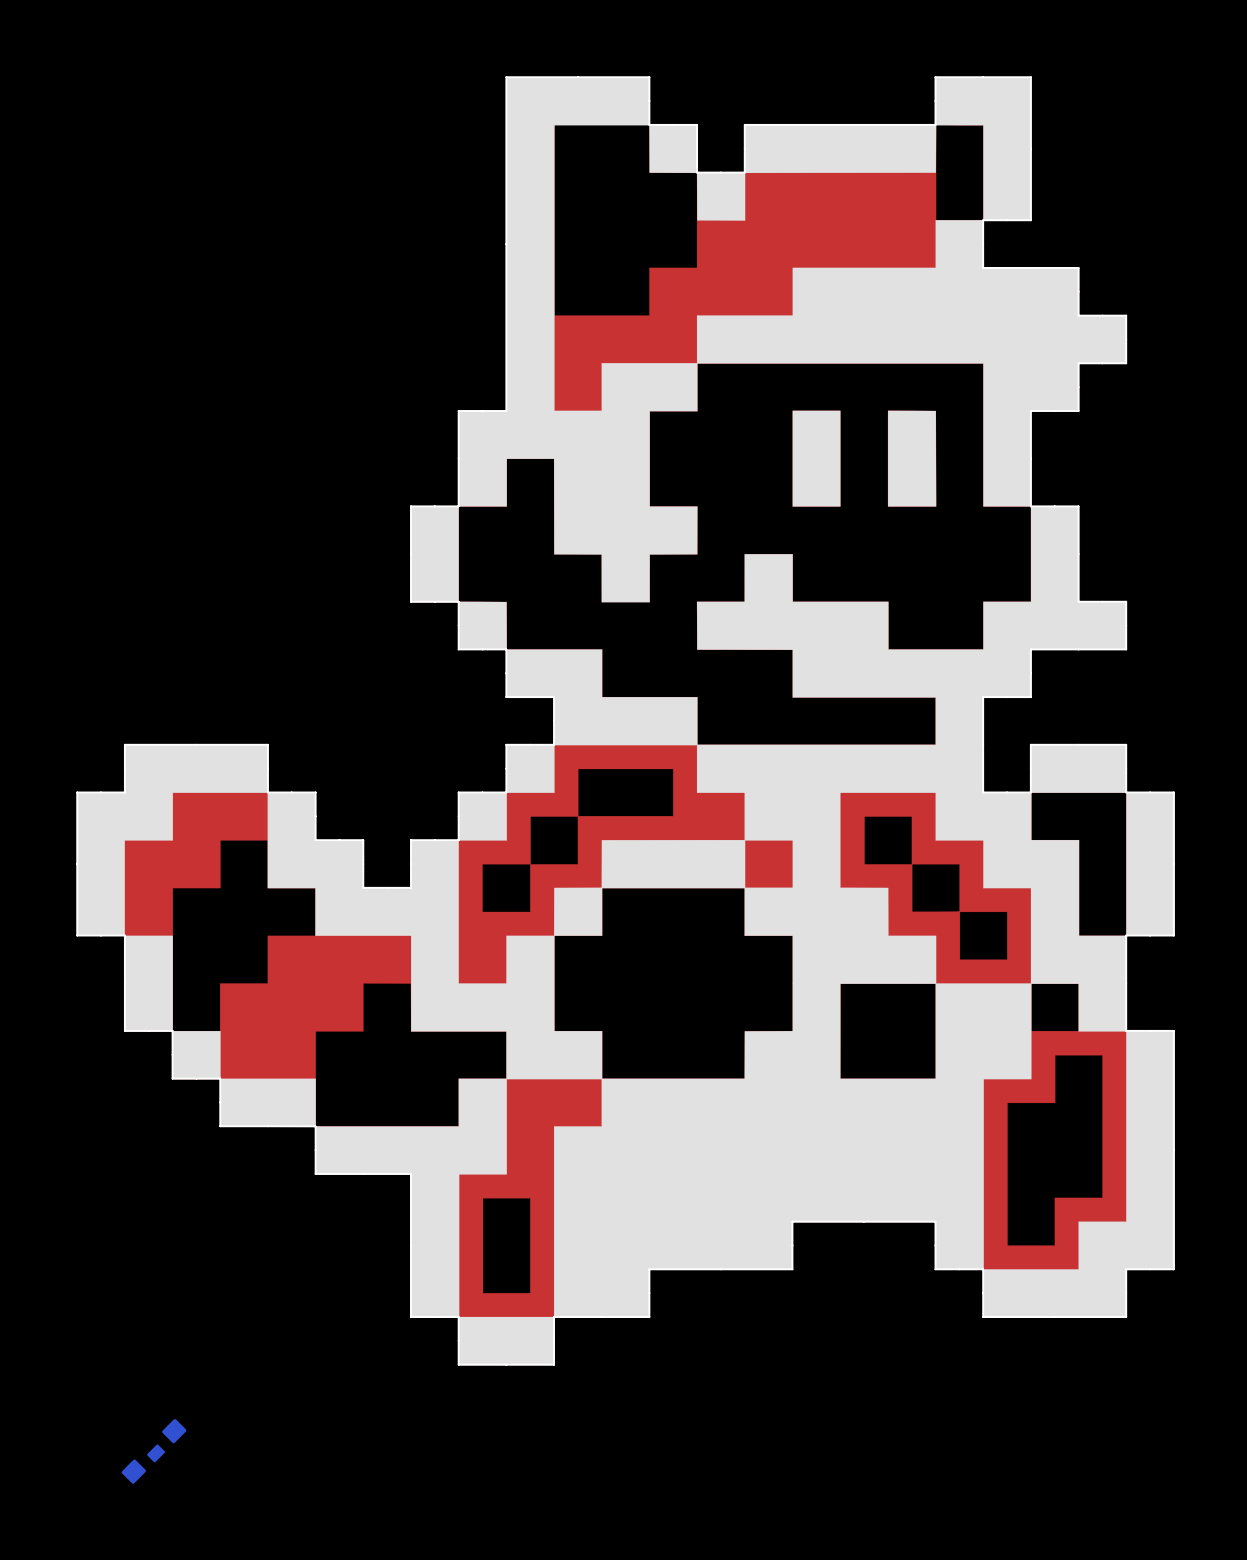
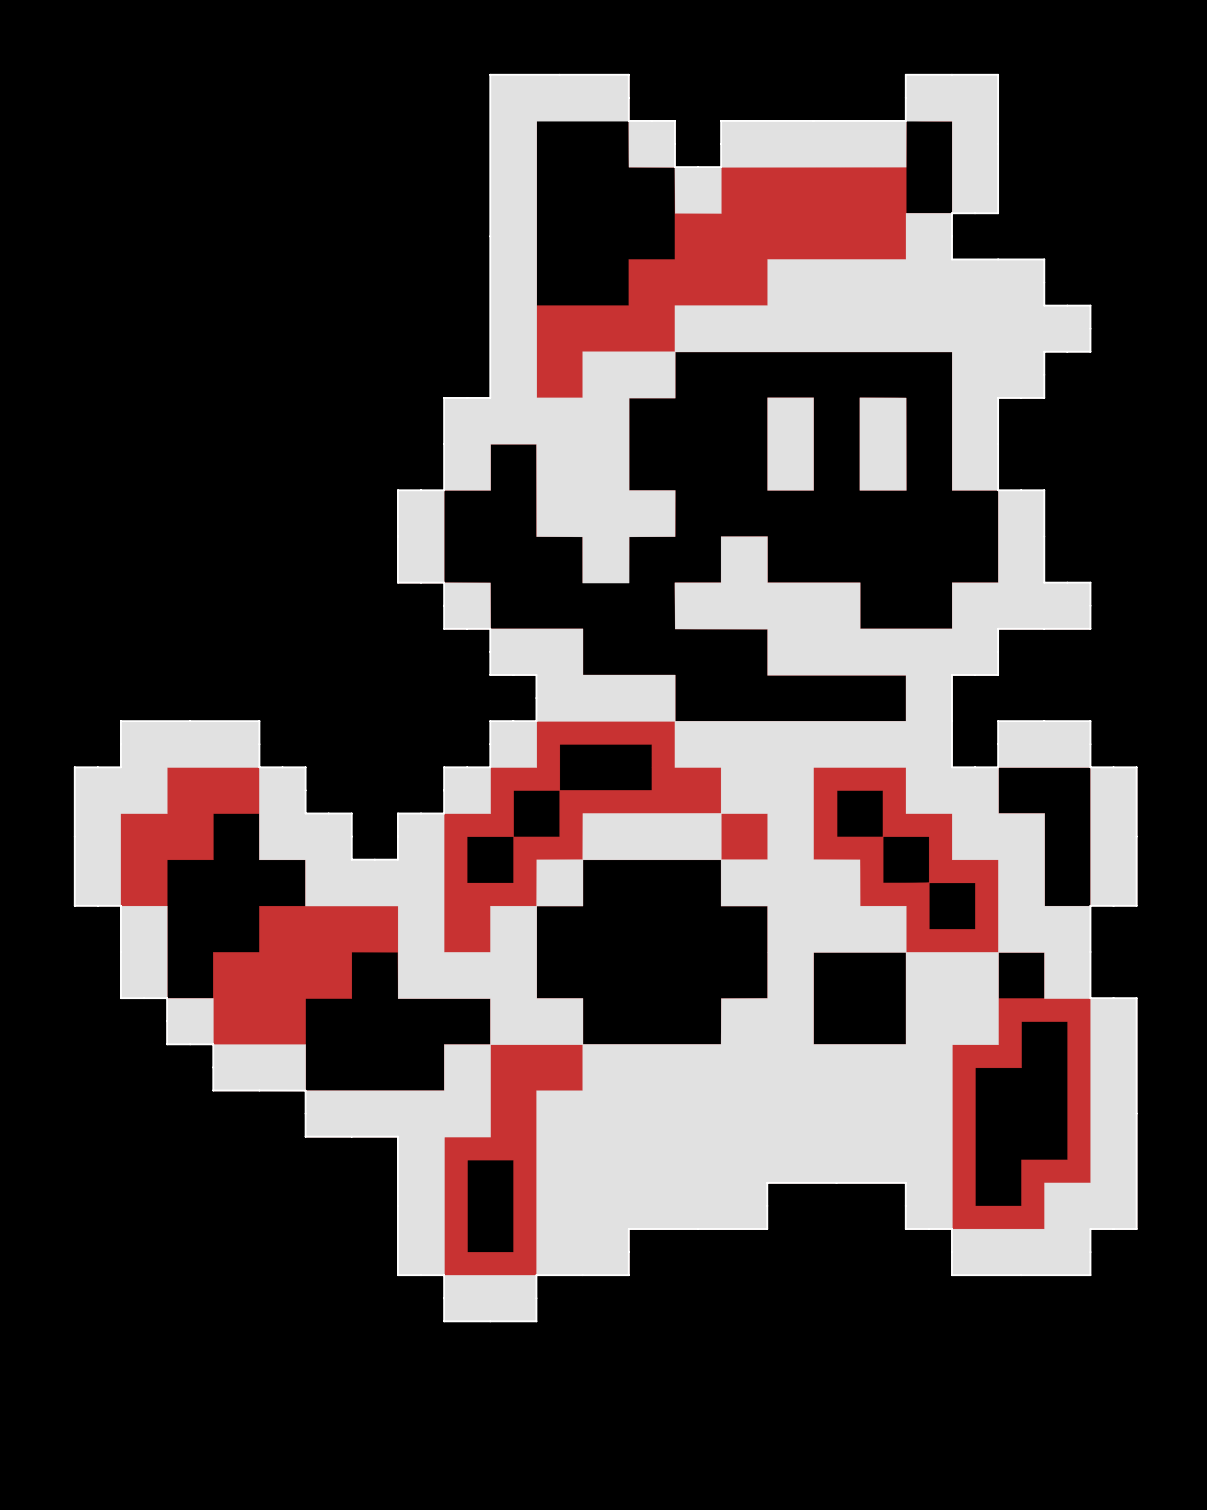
part: (154, 1451) -> none

